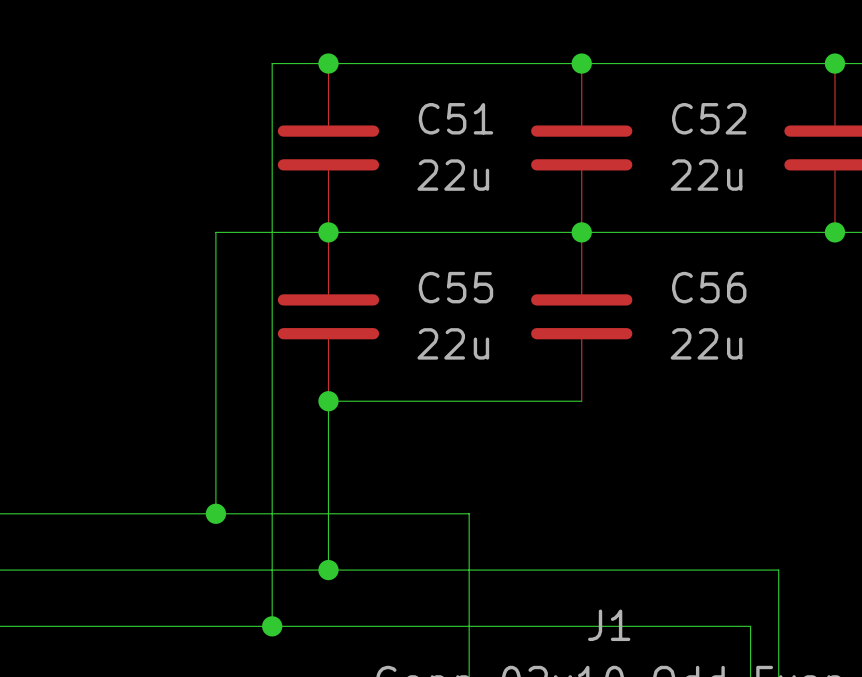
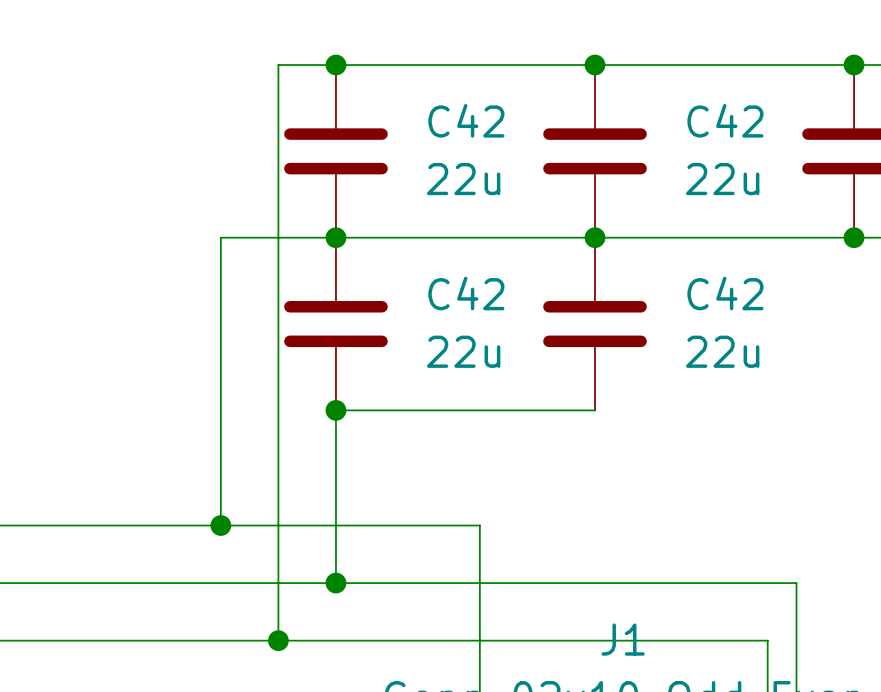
C51 name: C51 (455, 118) -> C42 (466, 120)
C52 name: C52 (709, 118) -> C42 (725, 120)
C55 name: C55 (455, 287) -> C42 (466, 293)
C56 name: C56 (709, 287) -> C42 (725, 293)

